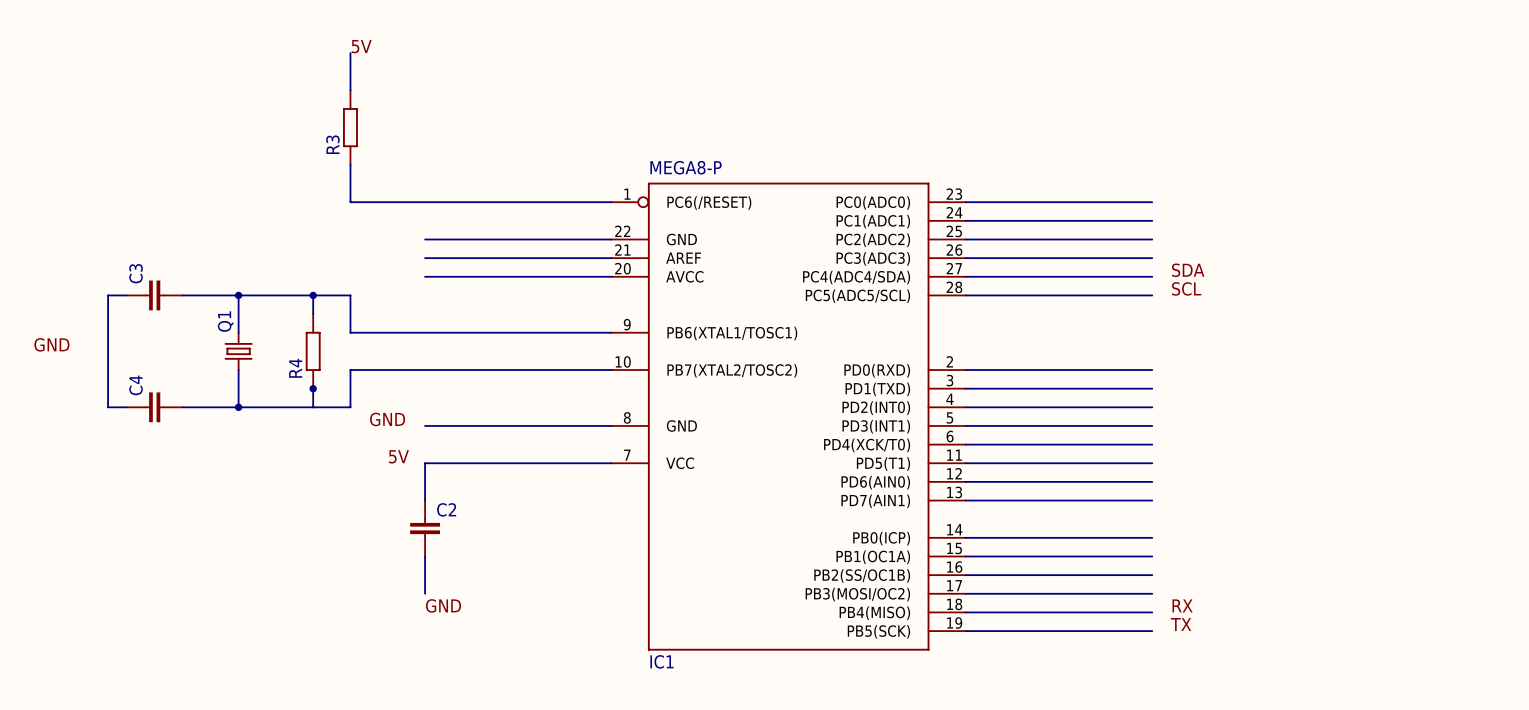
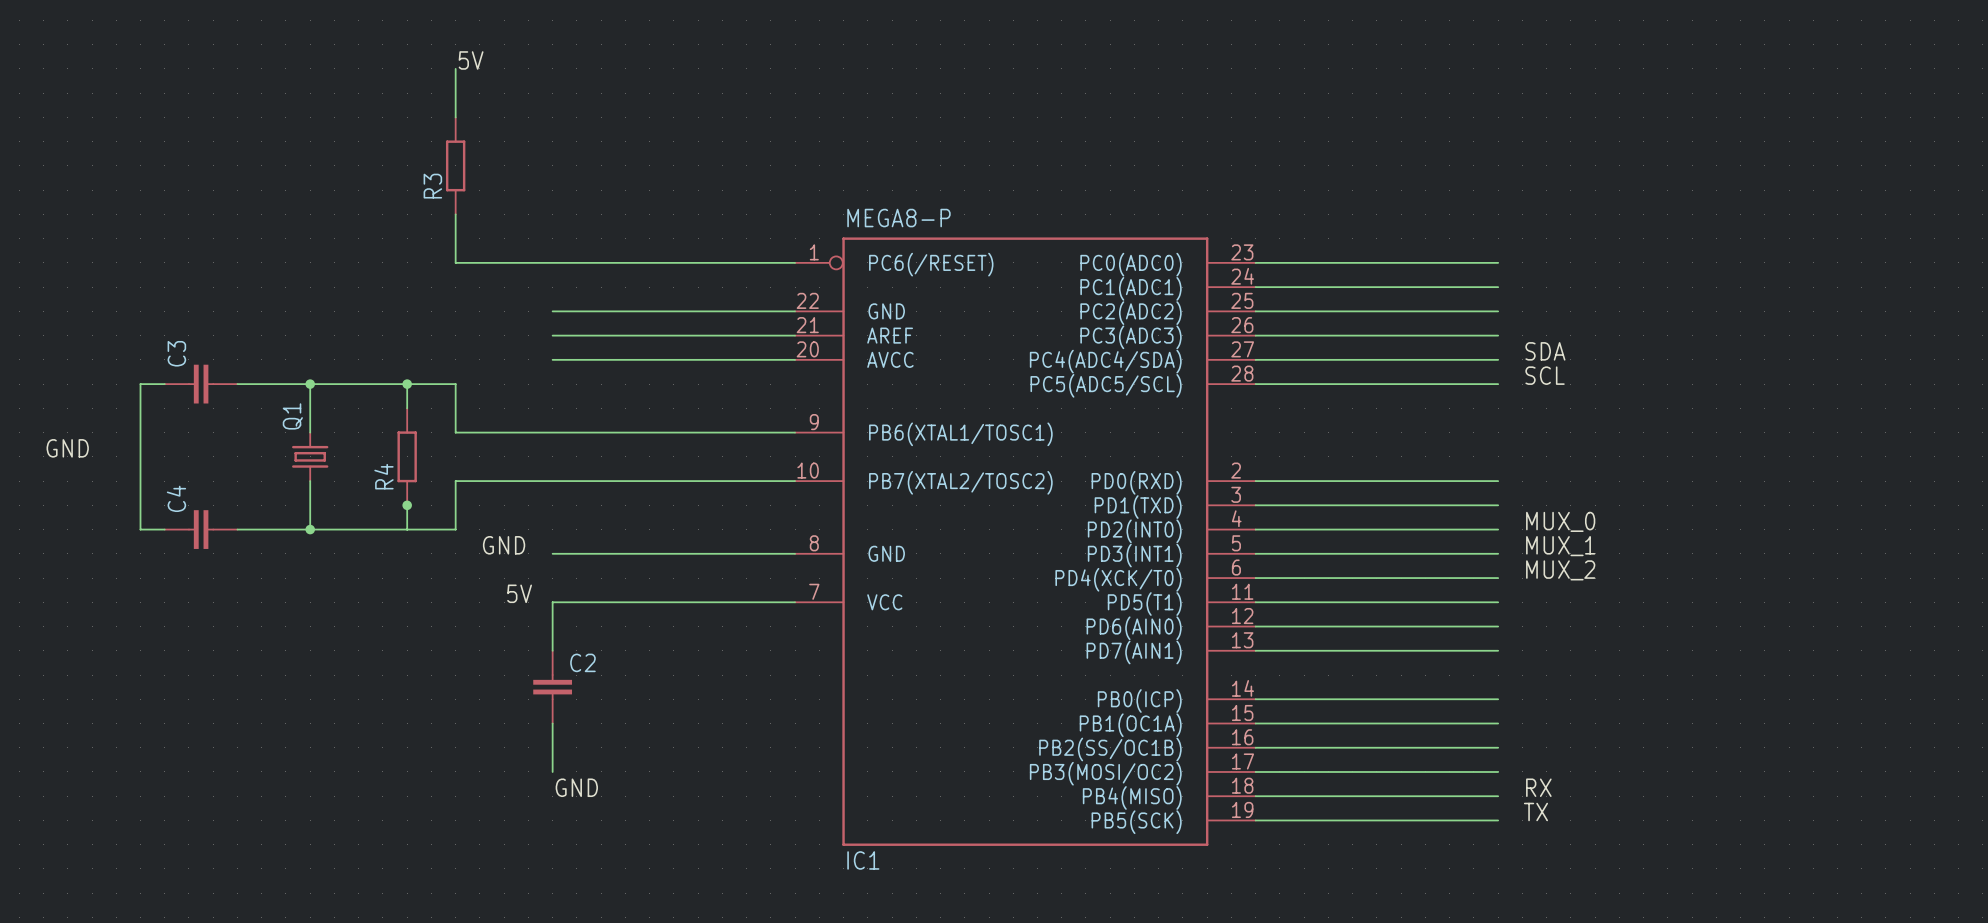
label: none -> MUX_0 (1560, 521)
label: none -> MUX_1 (1560, 546)
label: none -> MUX_2 (1560, 570)

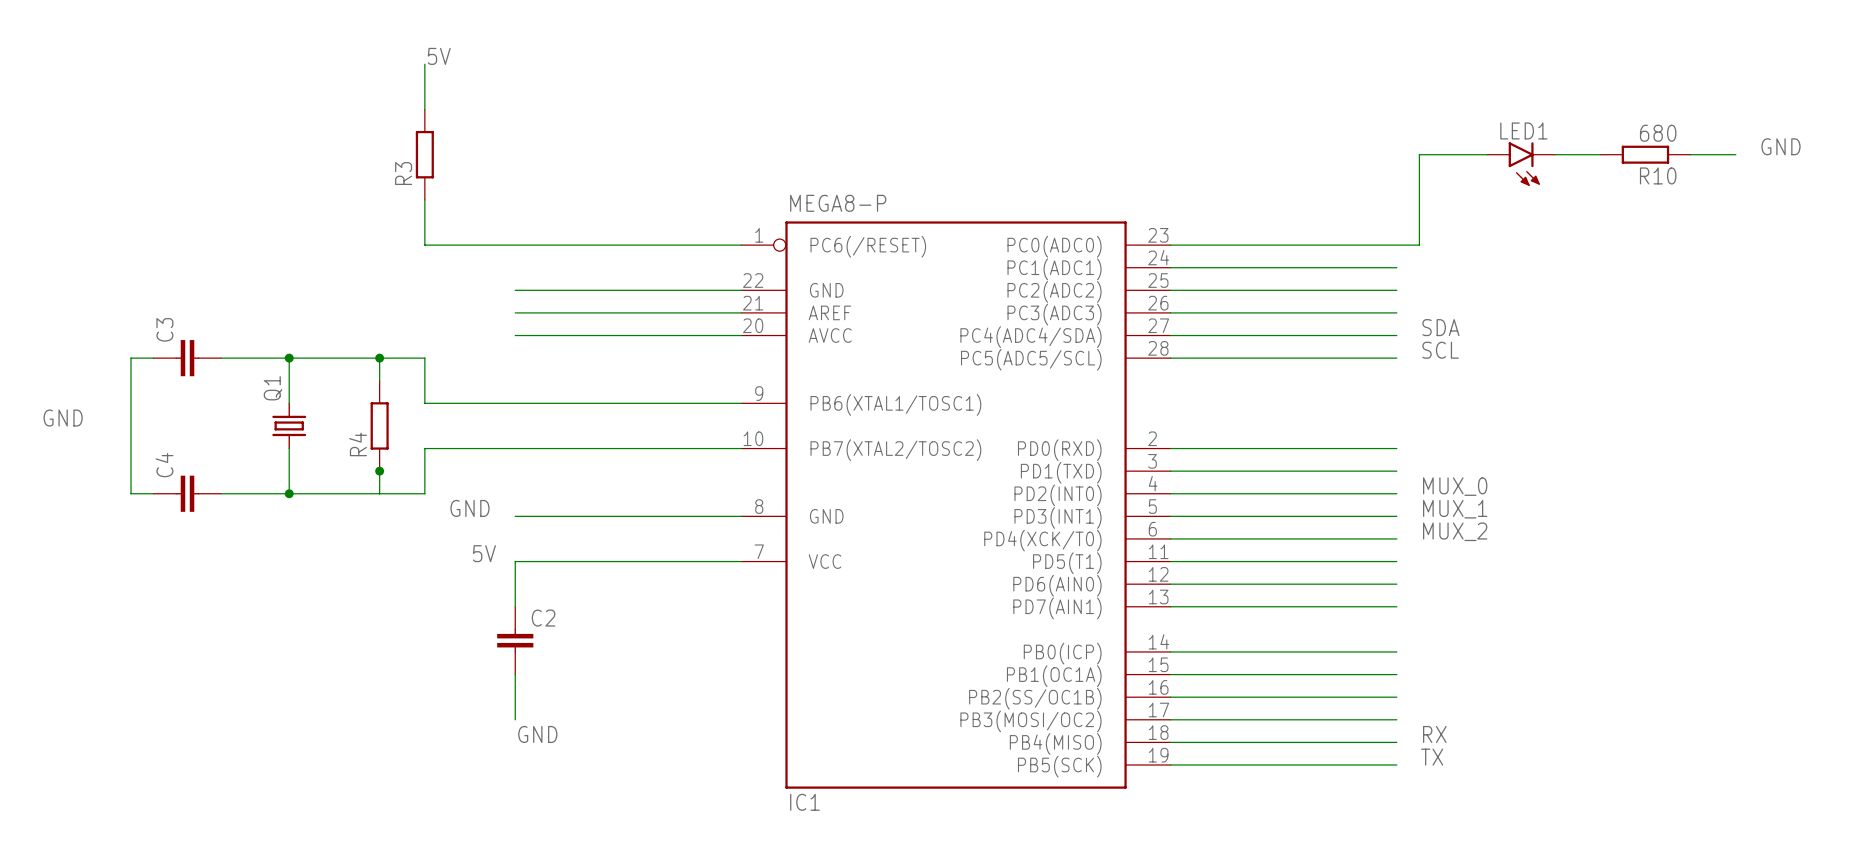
label: none -> GND (1780, 146)
wire: none -> (1487, 154) (1419, 154) (1419, 245) (1396, 245)
wire: none -> (1555, 154) (1600, 154)
R10: none -> 680 (1645, 154)
wire: none -> (1690, 154) (1735, 154)
LED1: none -> (1521, 164)

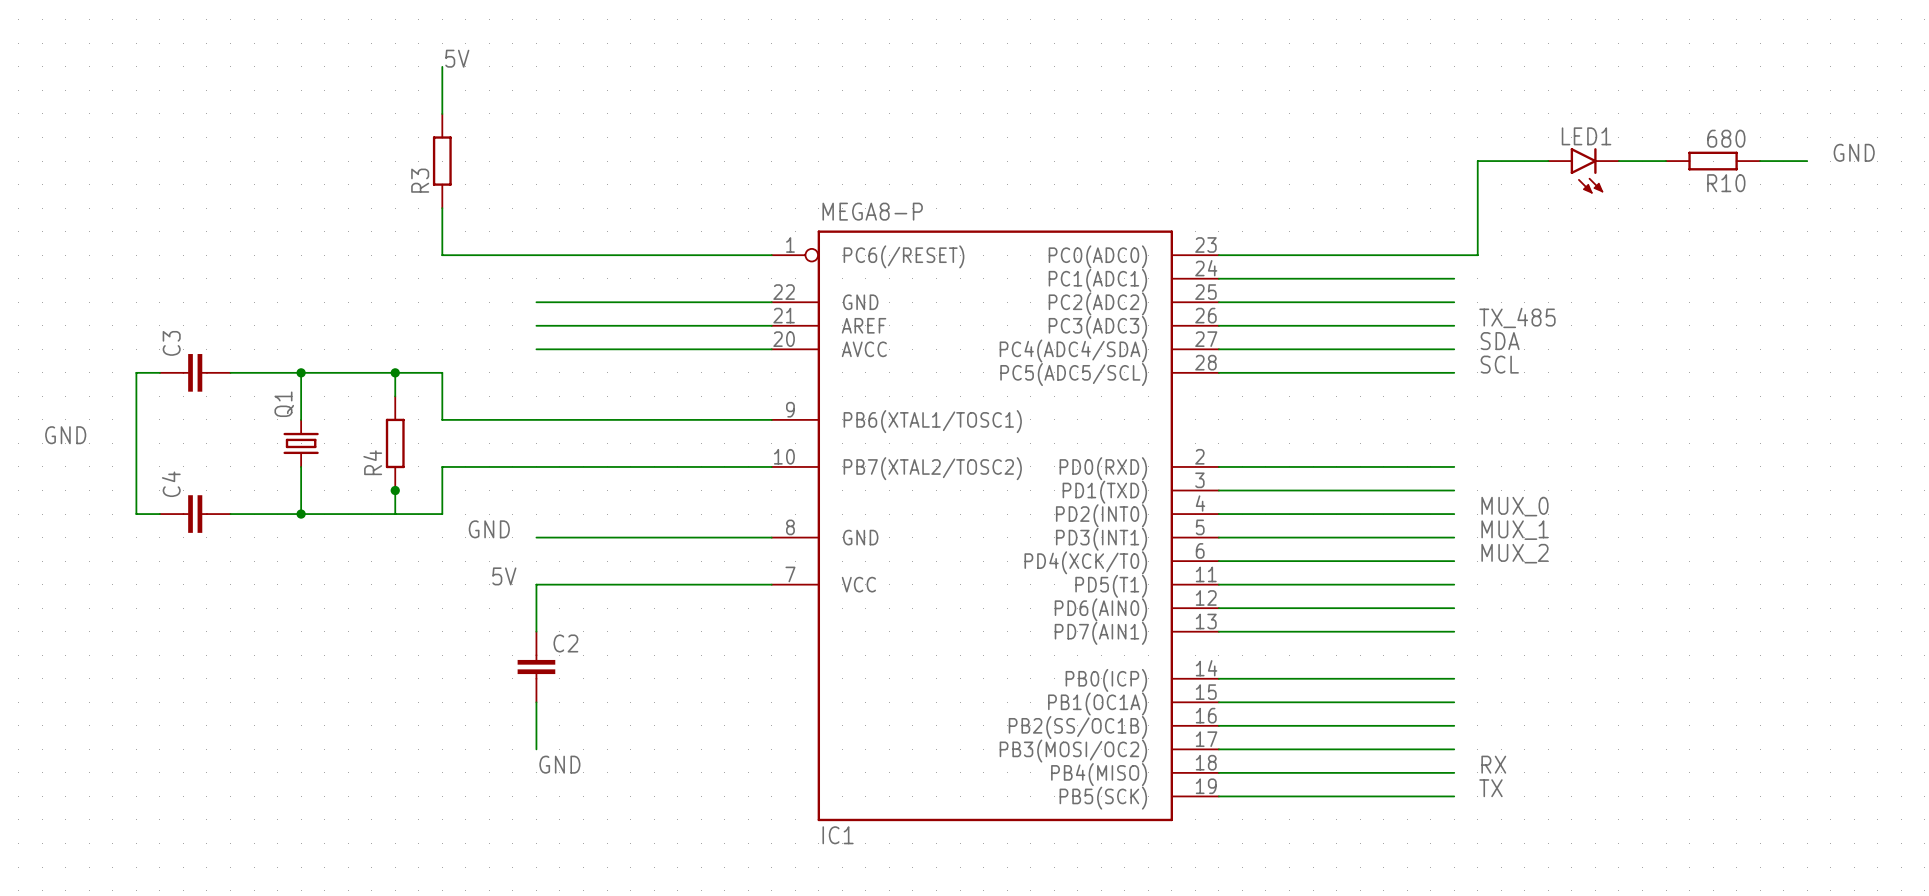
label: none -> TX_485 (1517, 317)

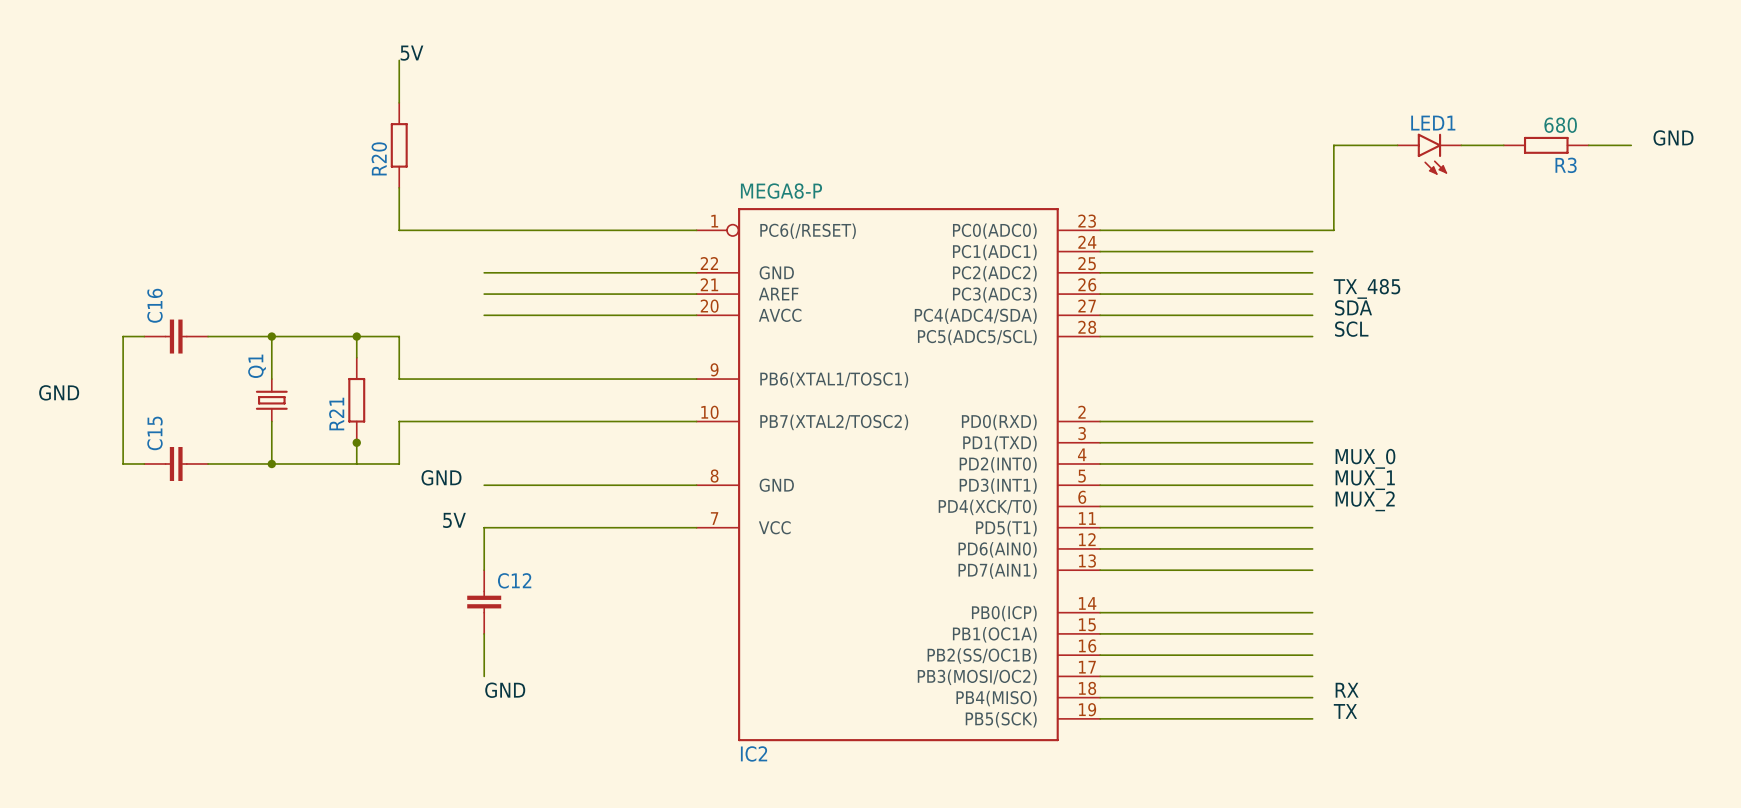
R3 name: R3 (420, 180) -> R20 (379, 158)
R10 name: R10 (1726, 183) -> R3 (1566, 165)
C3 name: C3 (171, 343) -> C16 (154, 305)
R4 name: R4 (372, 462) -> R21 (336, 414)
C4 name: C4 (171, 484) -> C15 (154, 433)
C2 name: C2 (565, 643) -> C12 (514, 580)
IC1 name: IC1 (838, 835) -> IC2 (754, 753)

